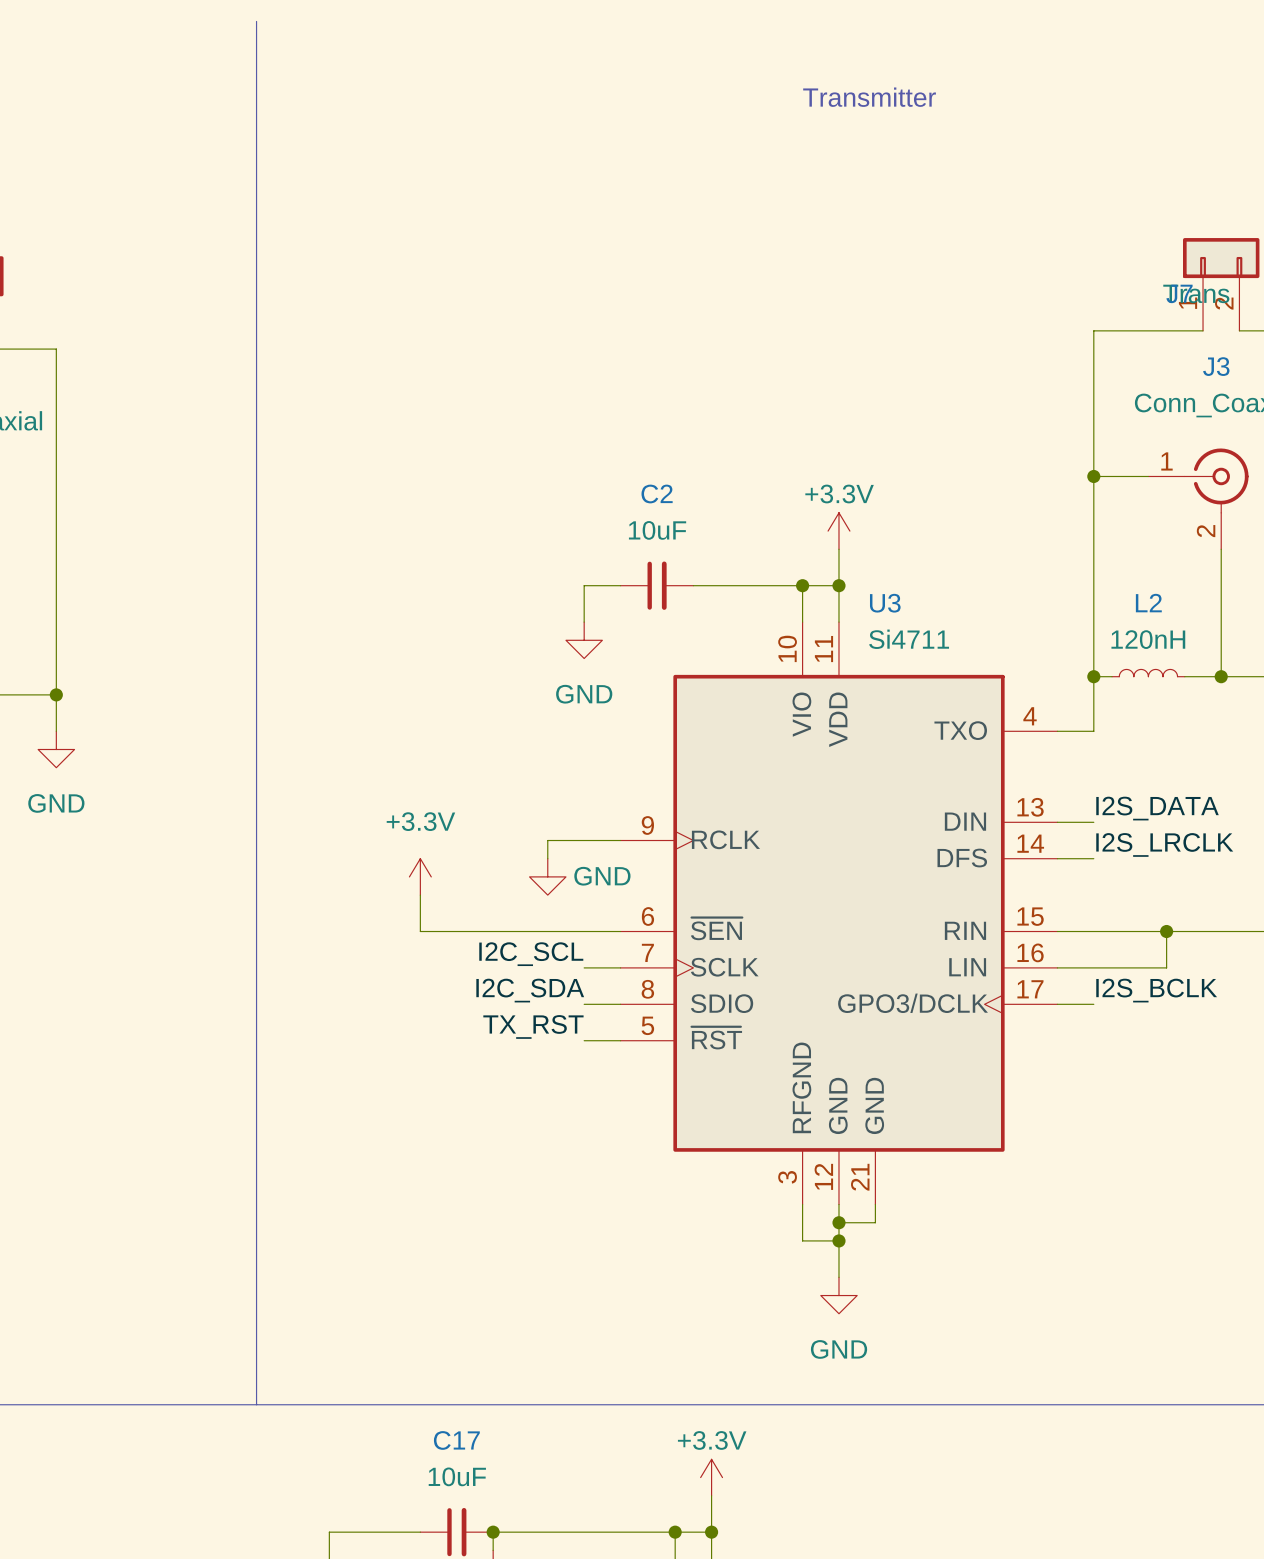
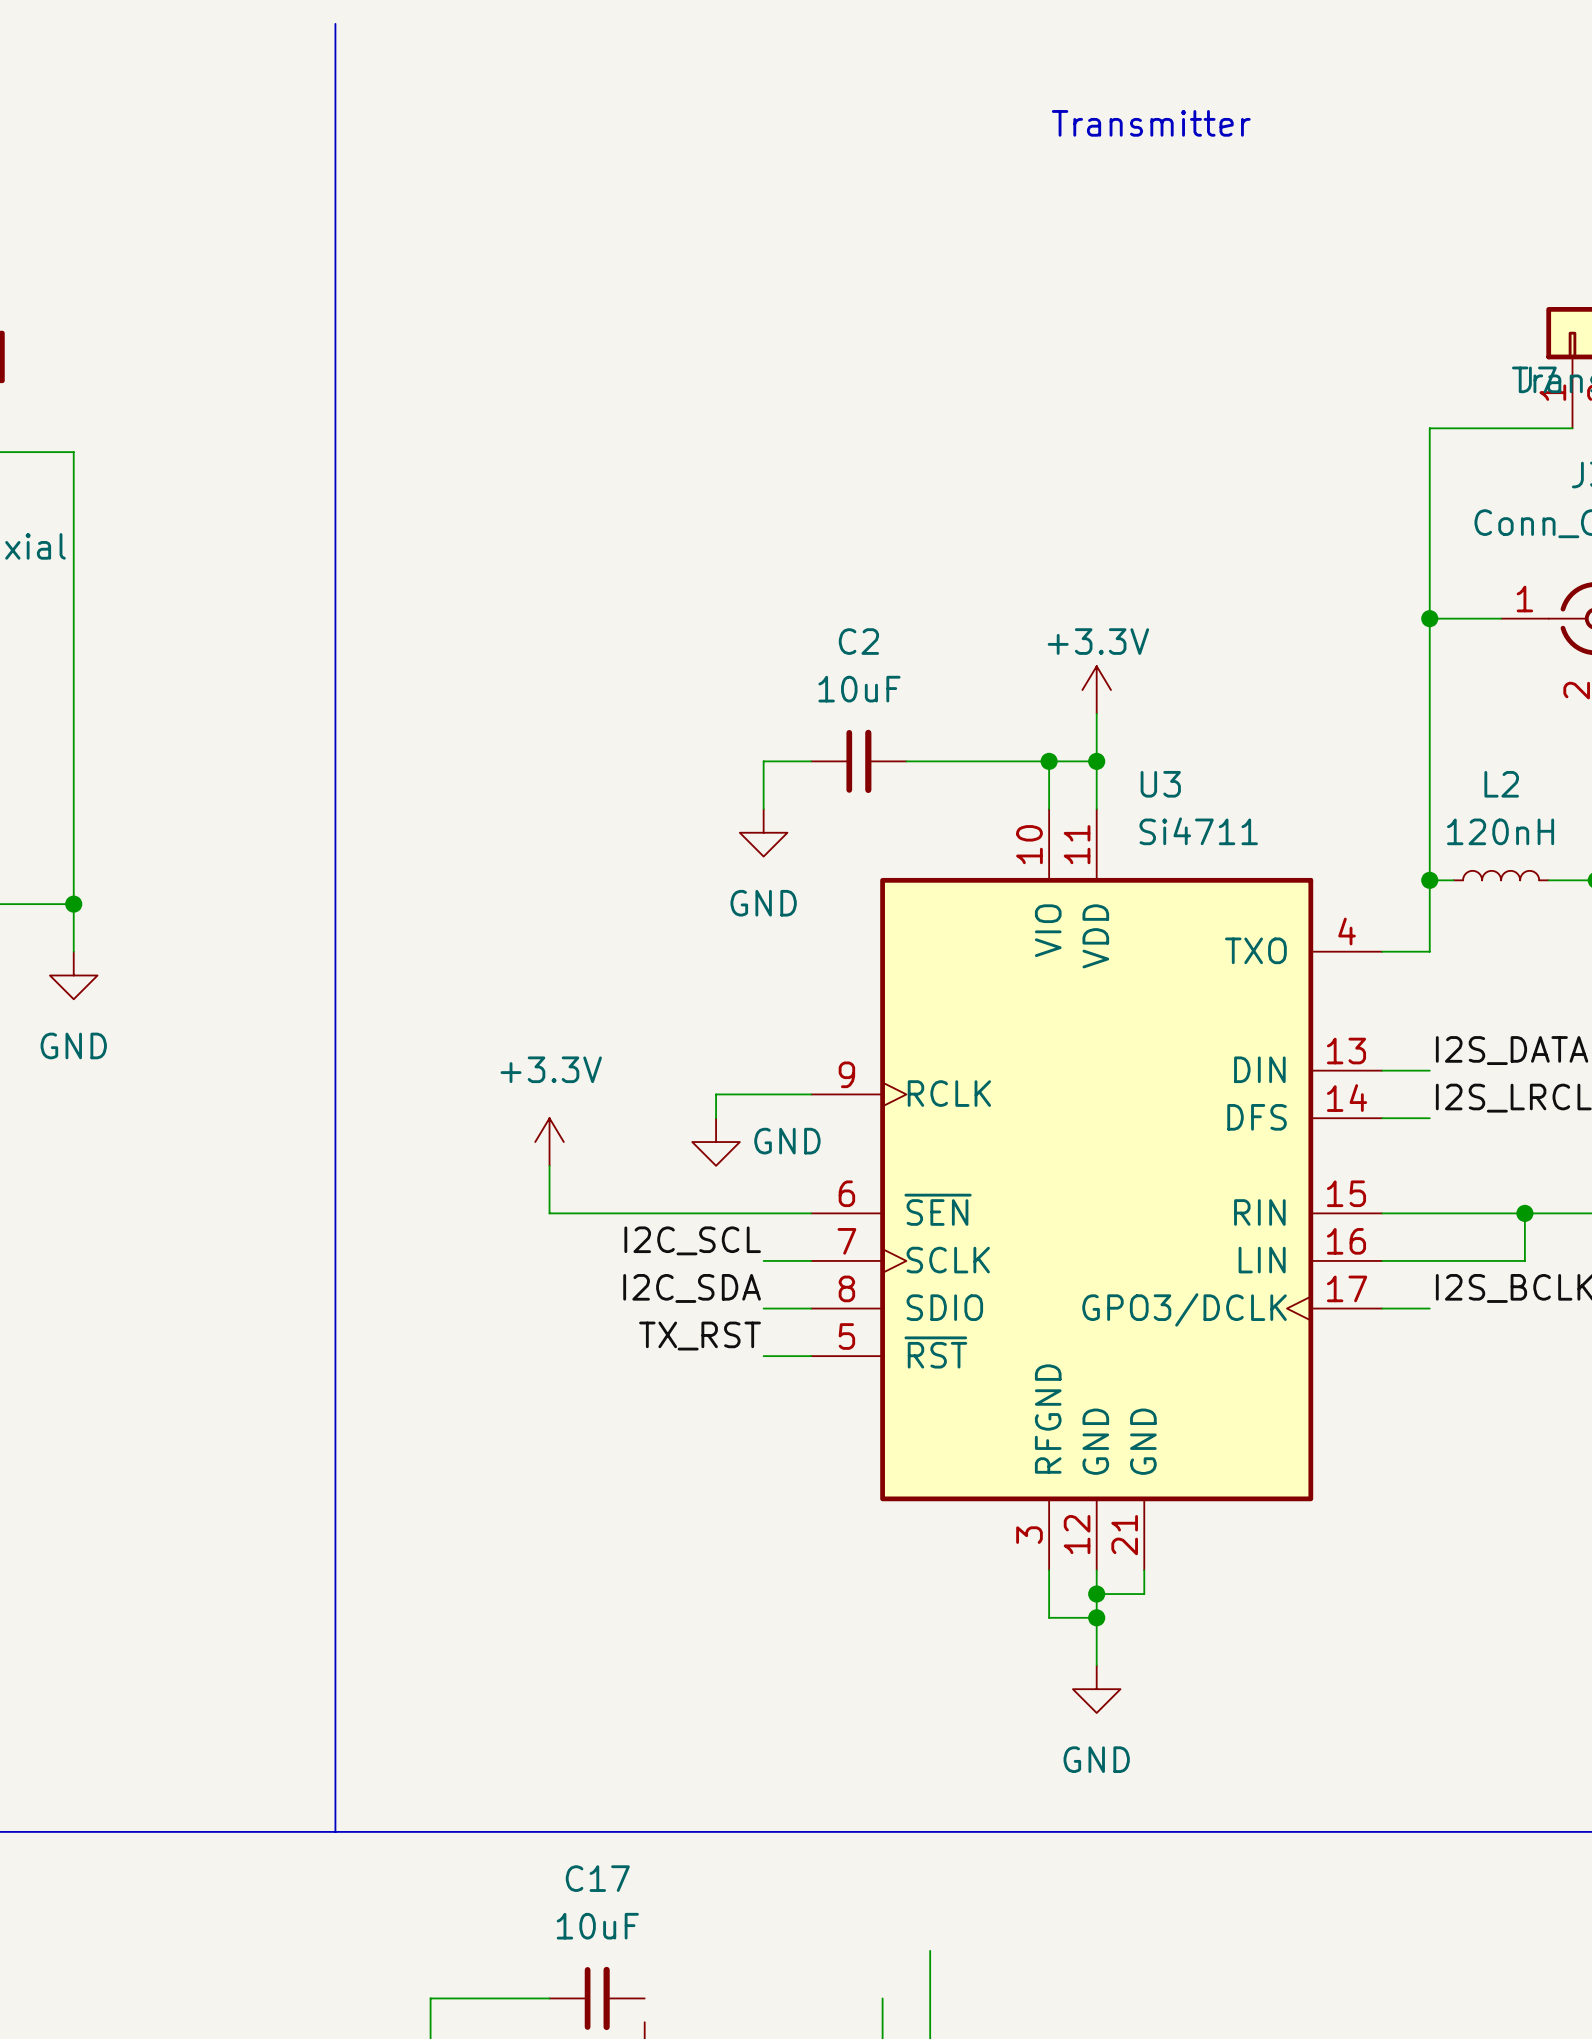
power symbol: +3.3V (711, 1477) -> none
junction: (493, 1532) -> none
junction: (675, 1532) -> none
wire: (711, 1532) (493, 1532) (493, 1550) -> none
junction: (711, 1532) -> none

